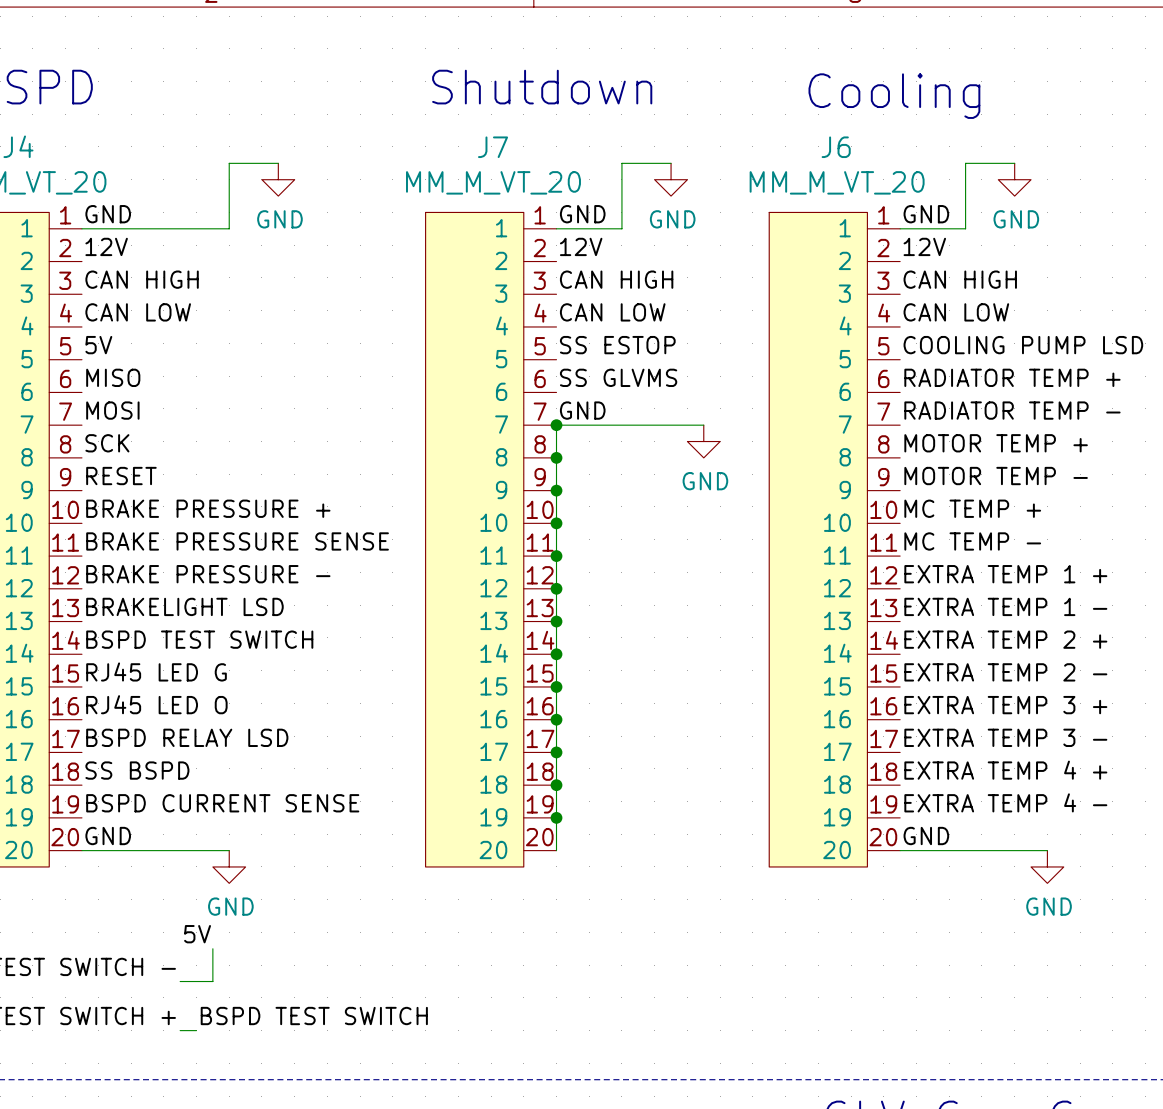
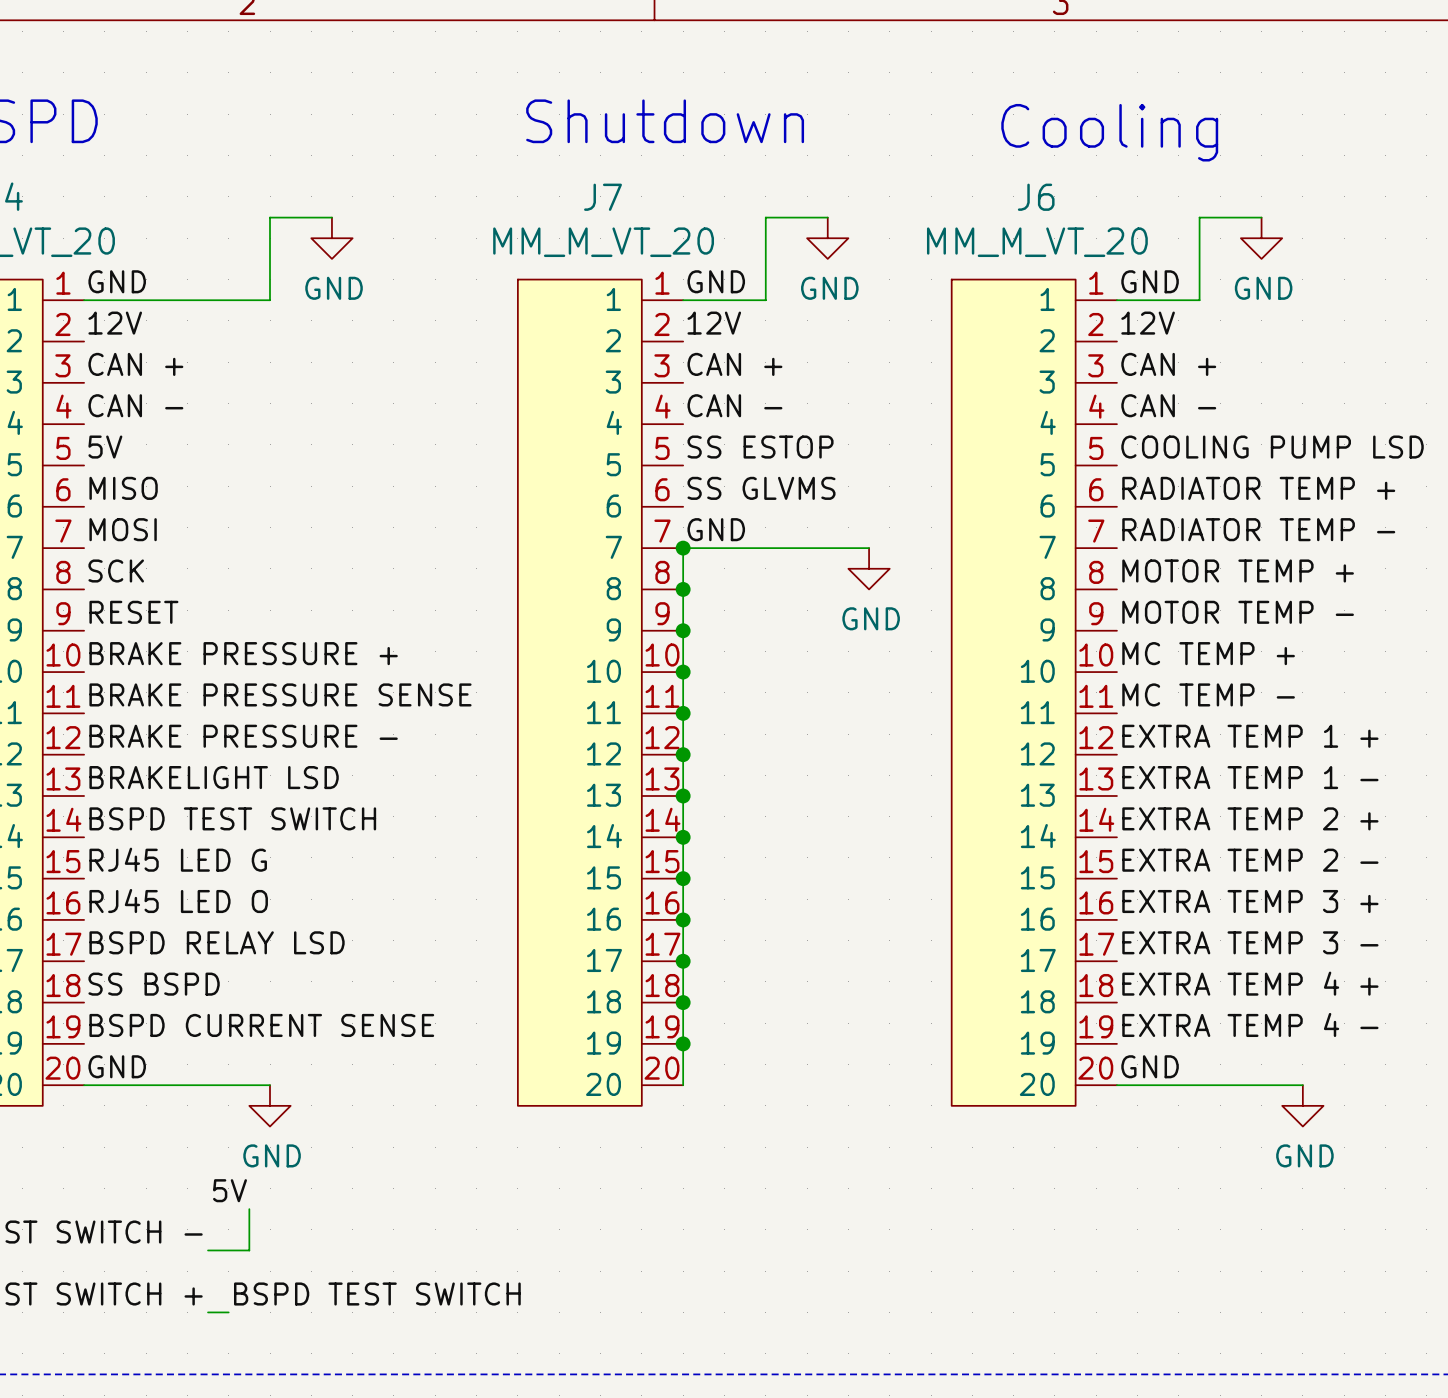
label: CAN HIGH (142, 279) -> CAN + (135, 364)
label: CAN HIGH (616, 279) -> CAN + (734, 364)
label: CAN HIGH (960, 279) -> CAN + (1168, 364)
label: CAN LOW (138, 312) -> CAN - (135, 405)
label: CAN LOW (612, 312) -> CAN - (734, 405)
label: CAN LOW (956, 312) -> CAN - (1168, 405)

